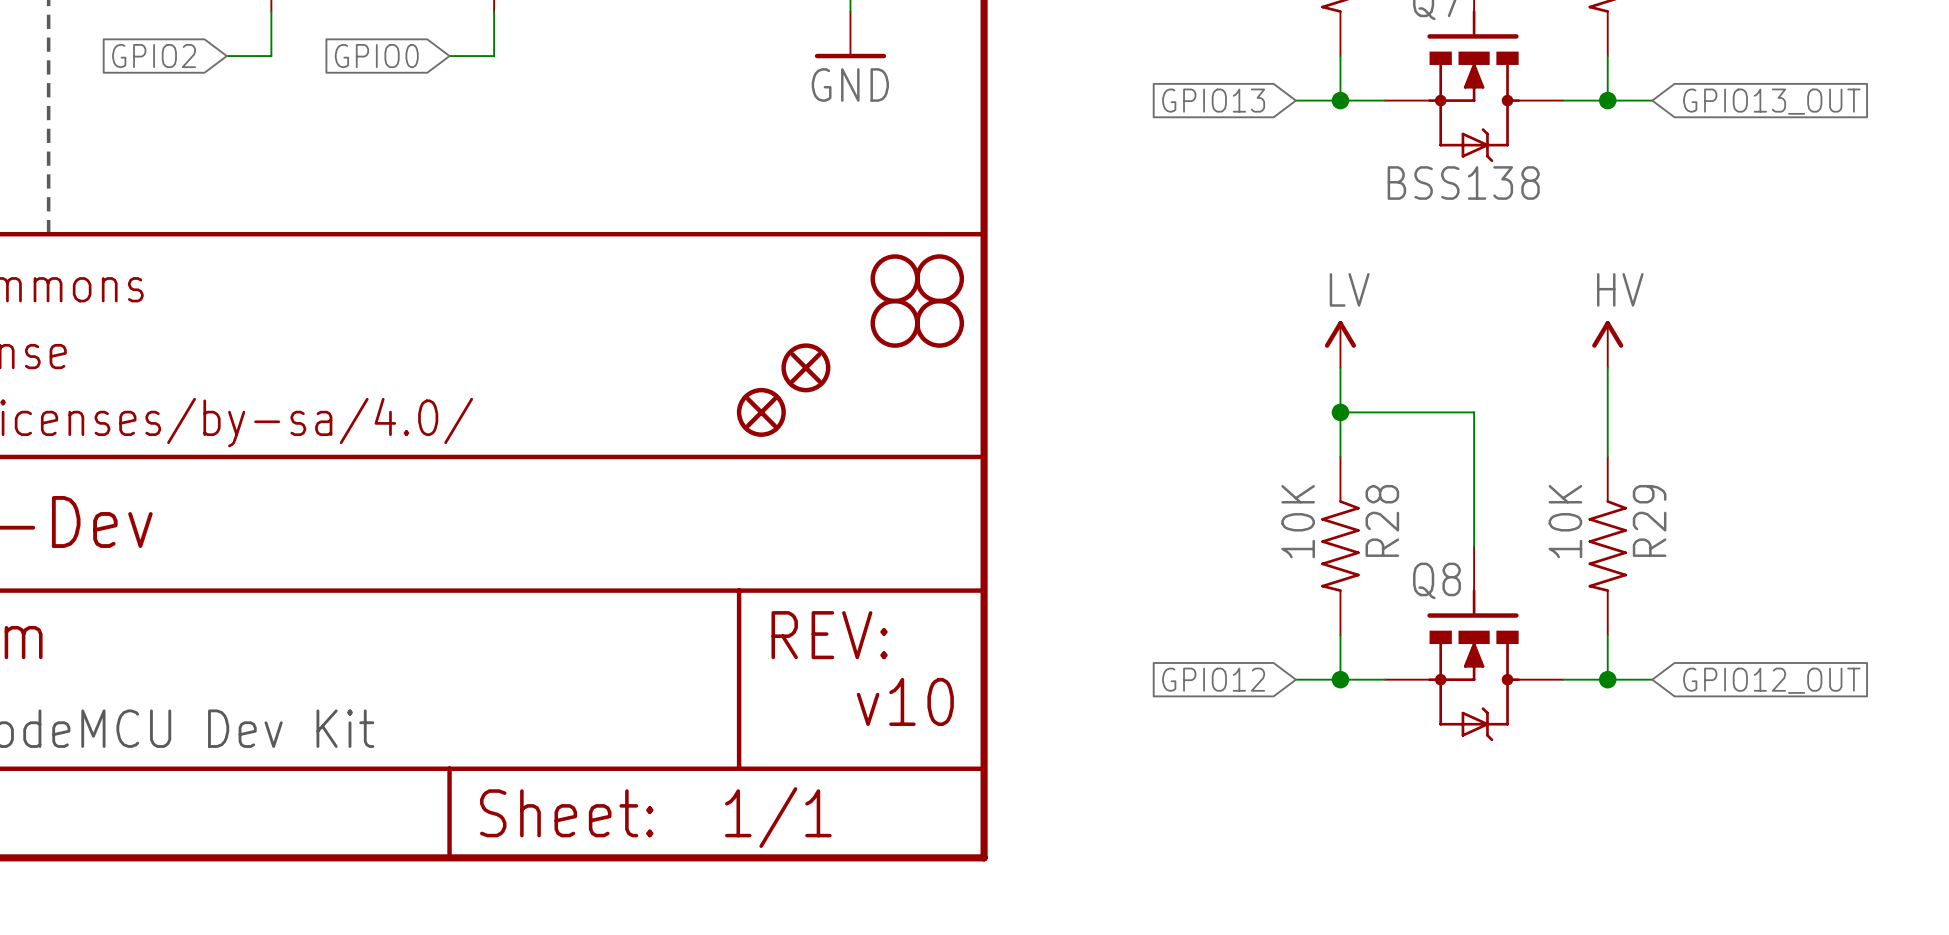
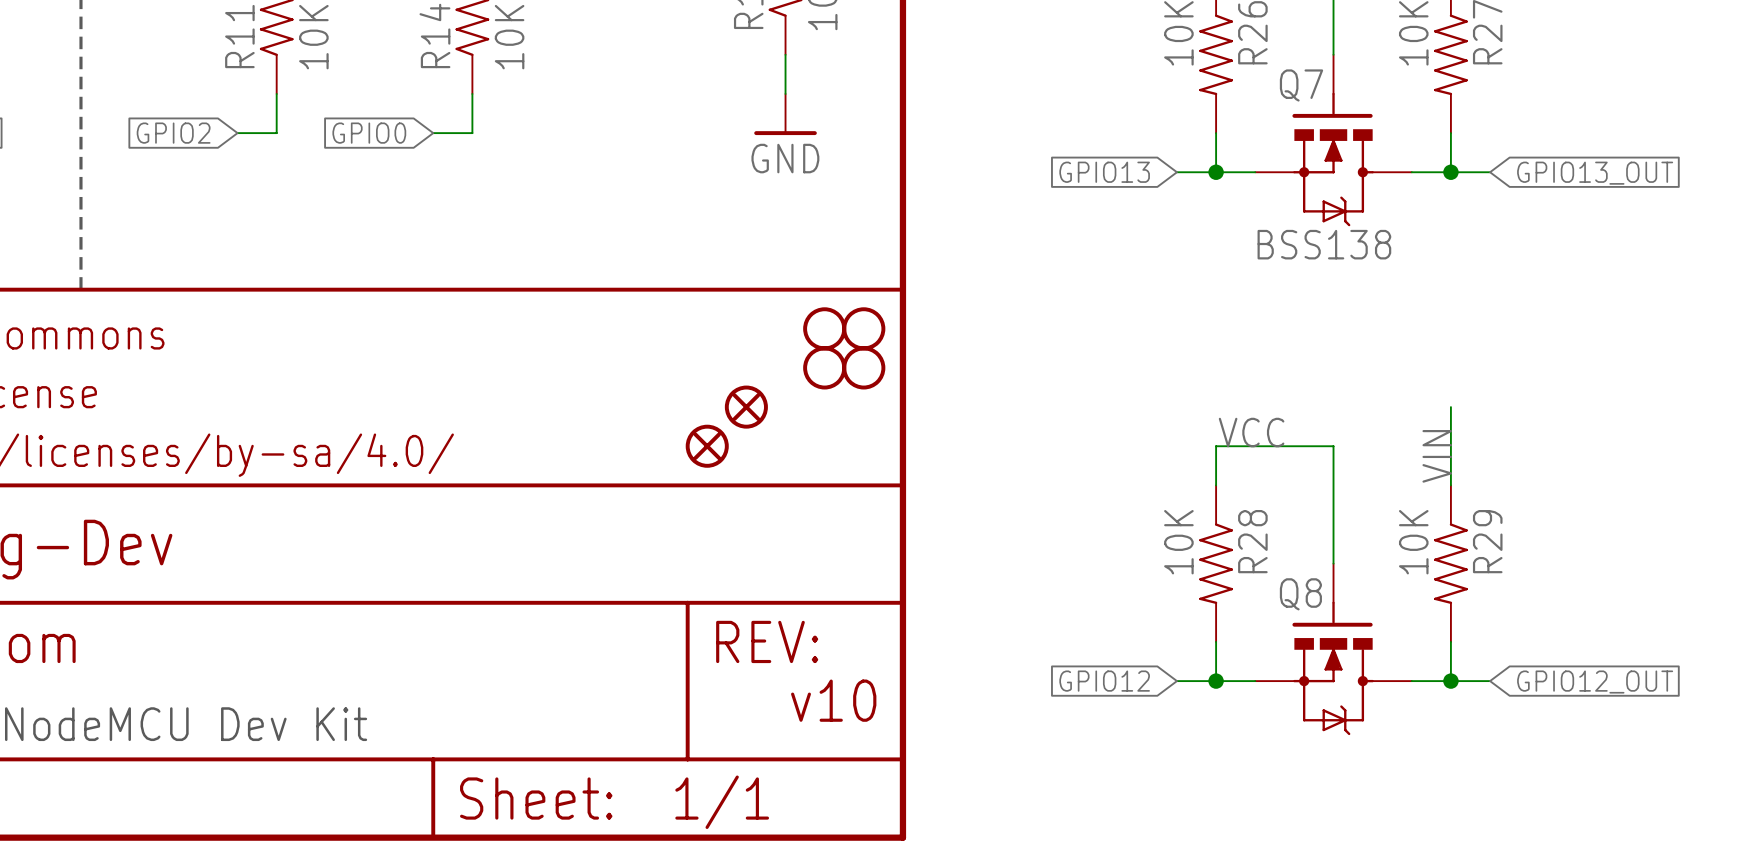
power symbol: LV (1340, 344) -> none
power symbol: HV (1607, 344) -> none
wire: (1340, 367) (1340, 412) -> none
label: none -> VCC (1251, 432)
junction: (1340, 412) -> none
label: none -> VIN (1437, 456)

